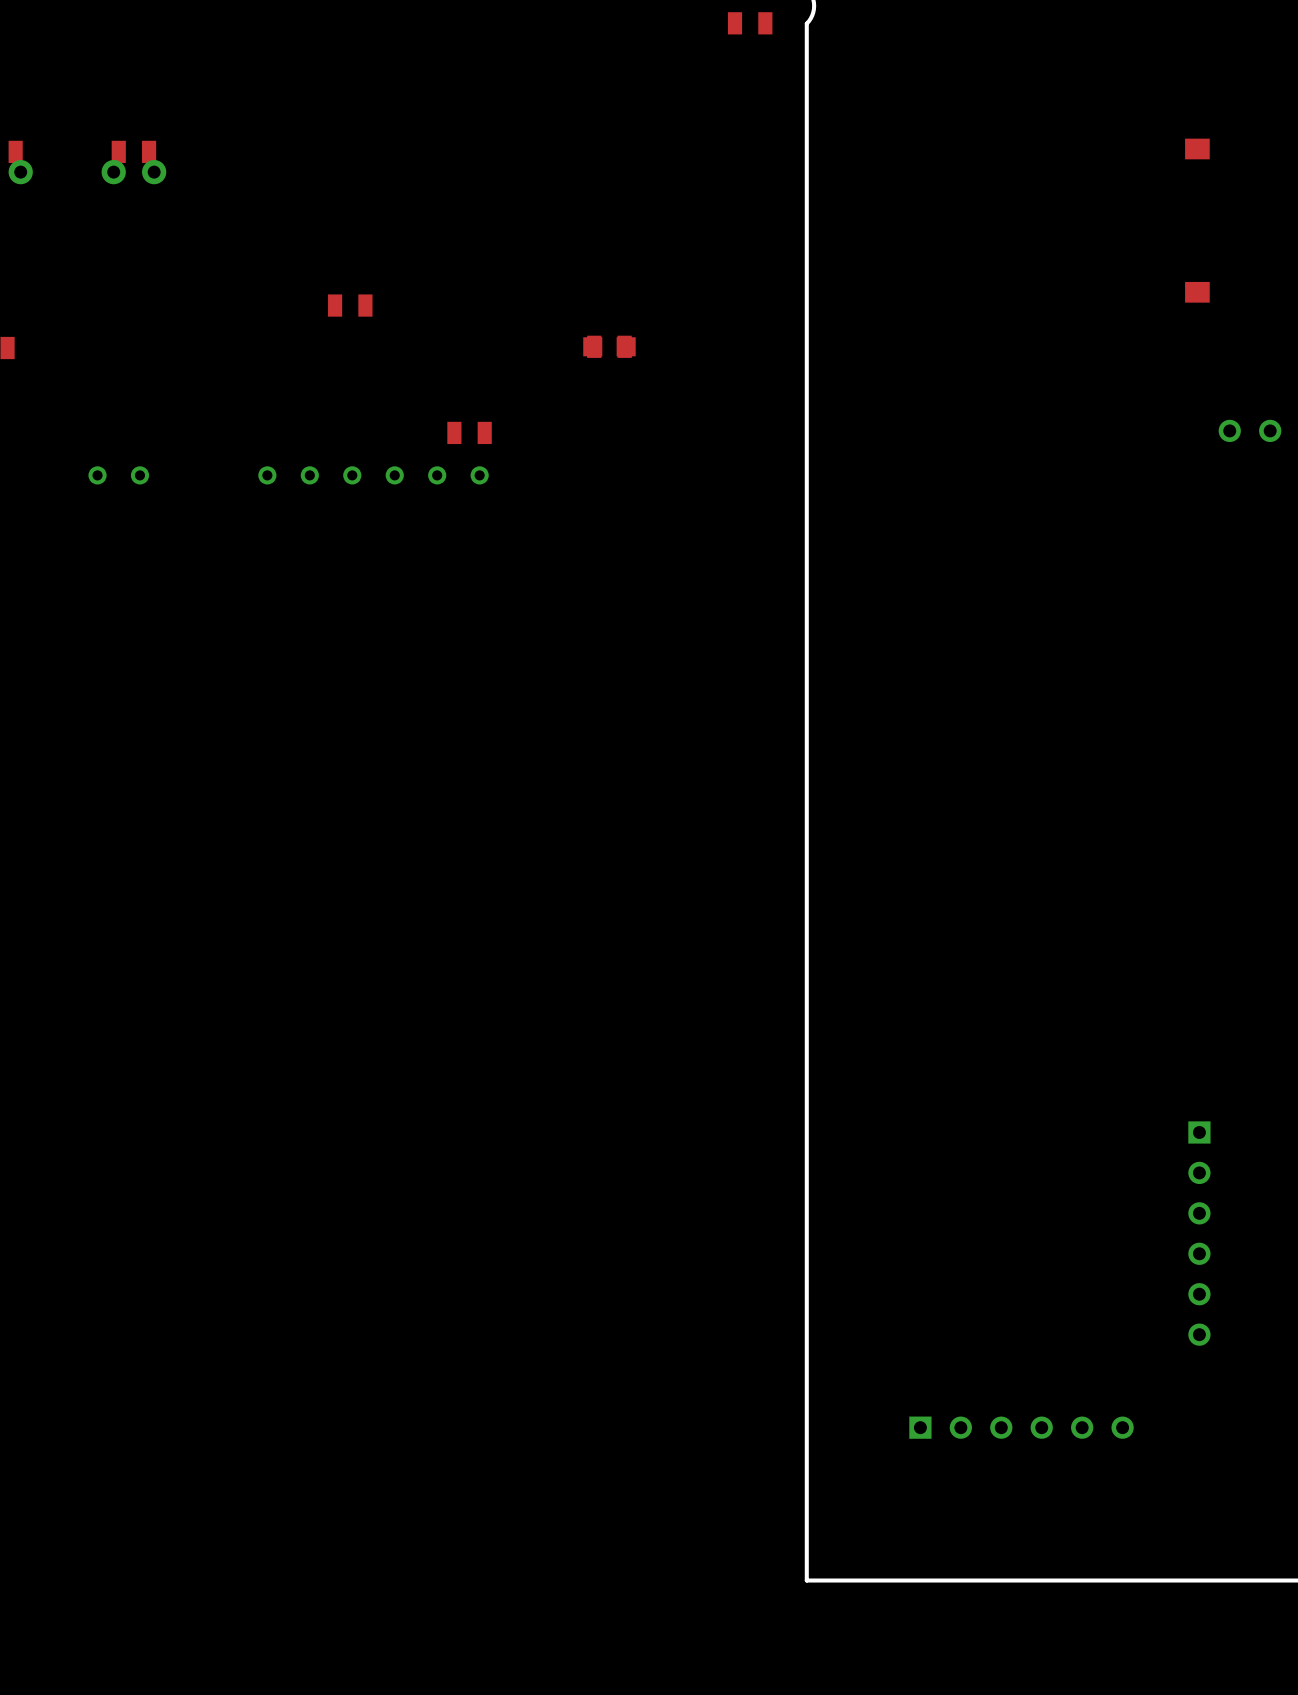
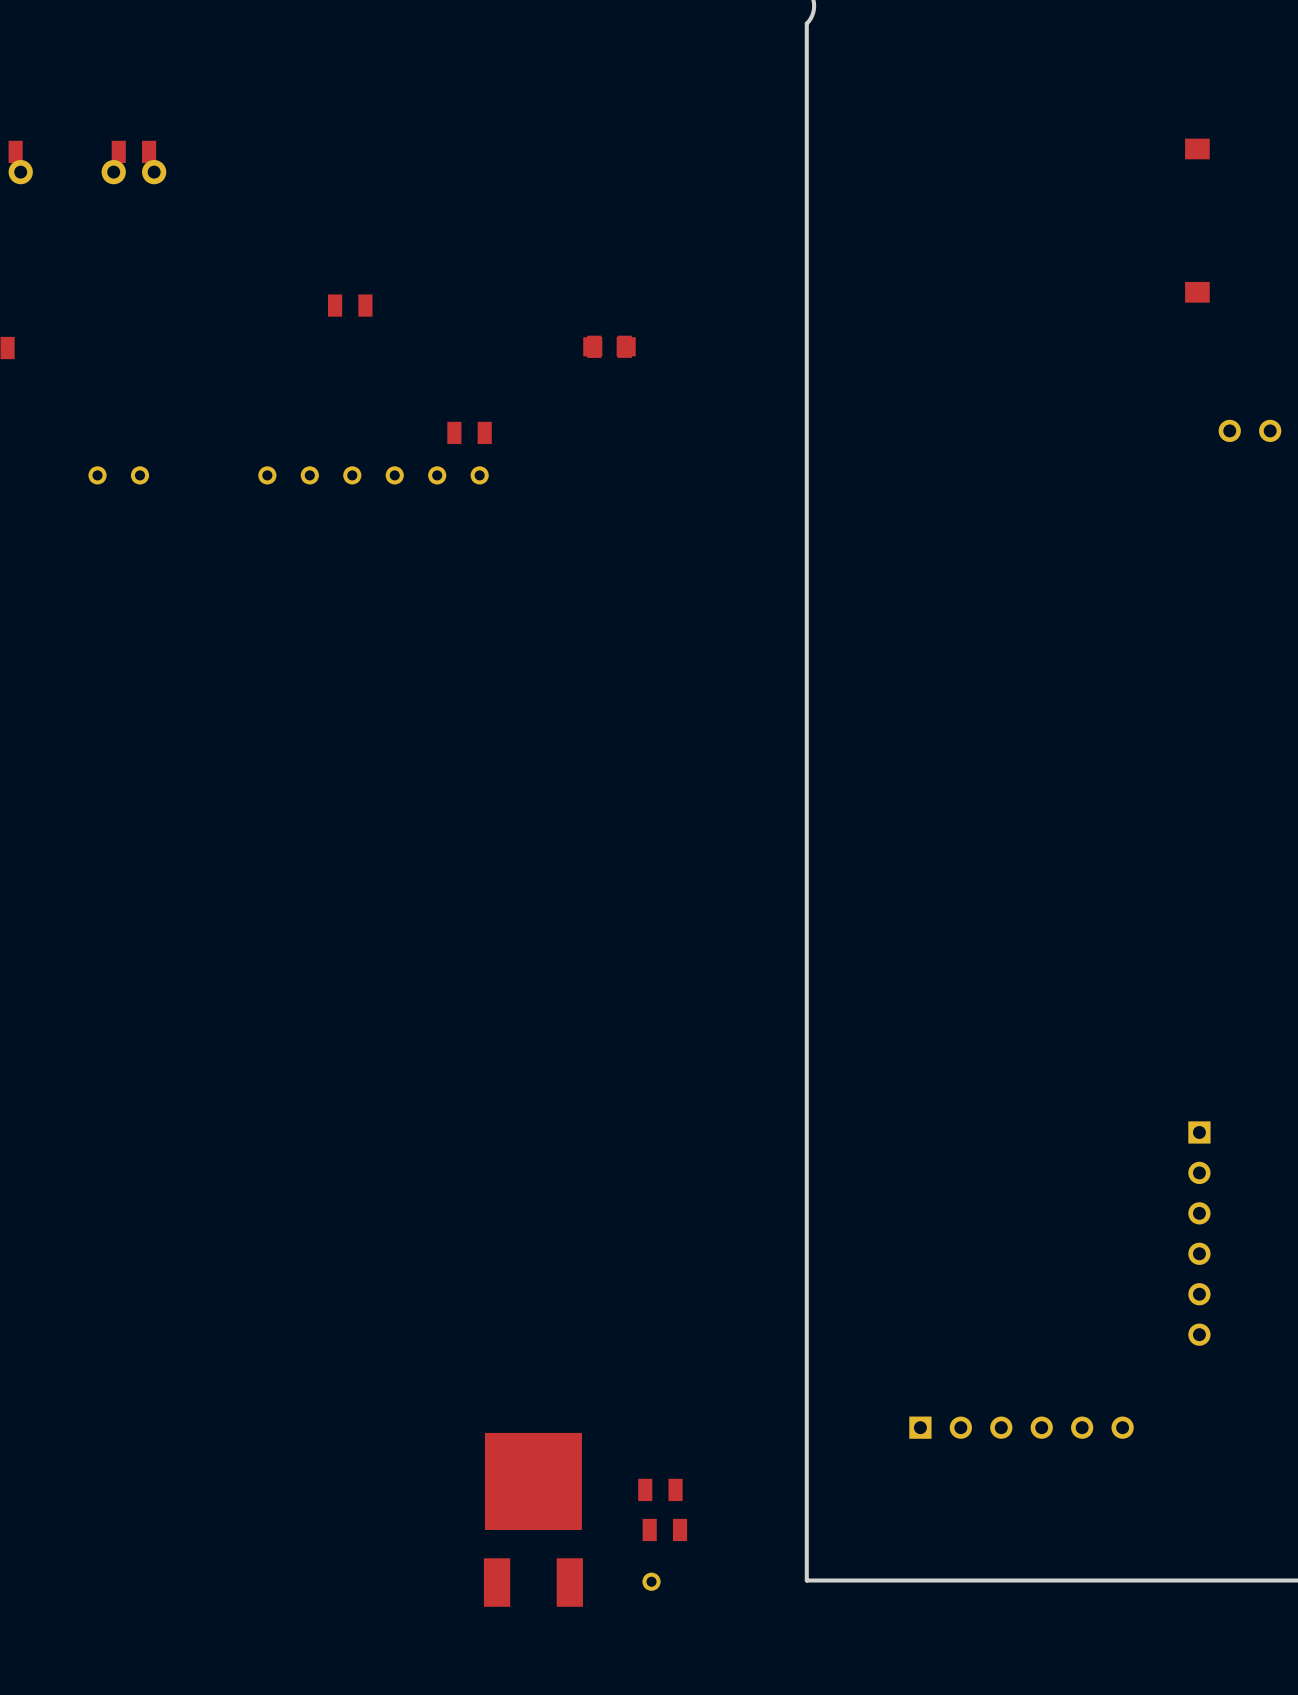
part: (750, 23) -> none
part: none -> (660, 1489)
part: none -> (533, 1519)
part: none -> (664, 1529)
part: none -> (651, 1581)

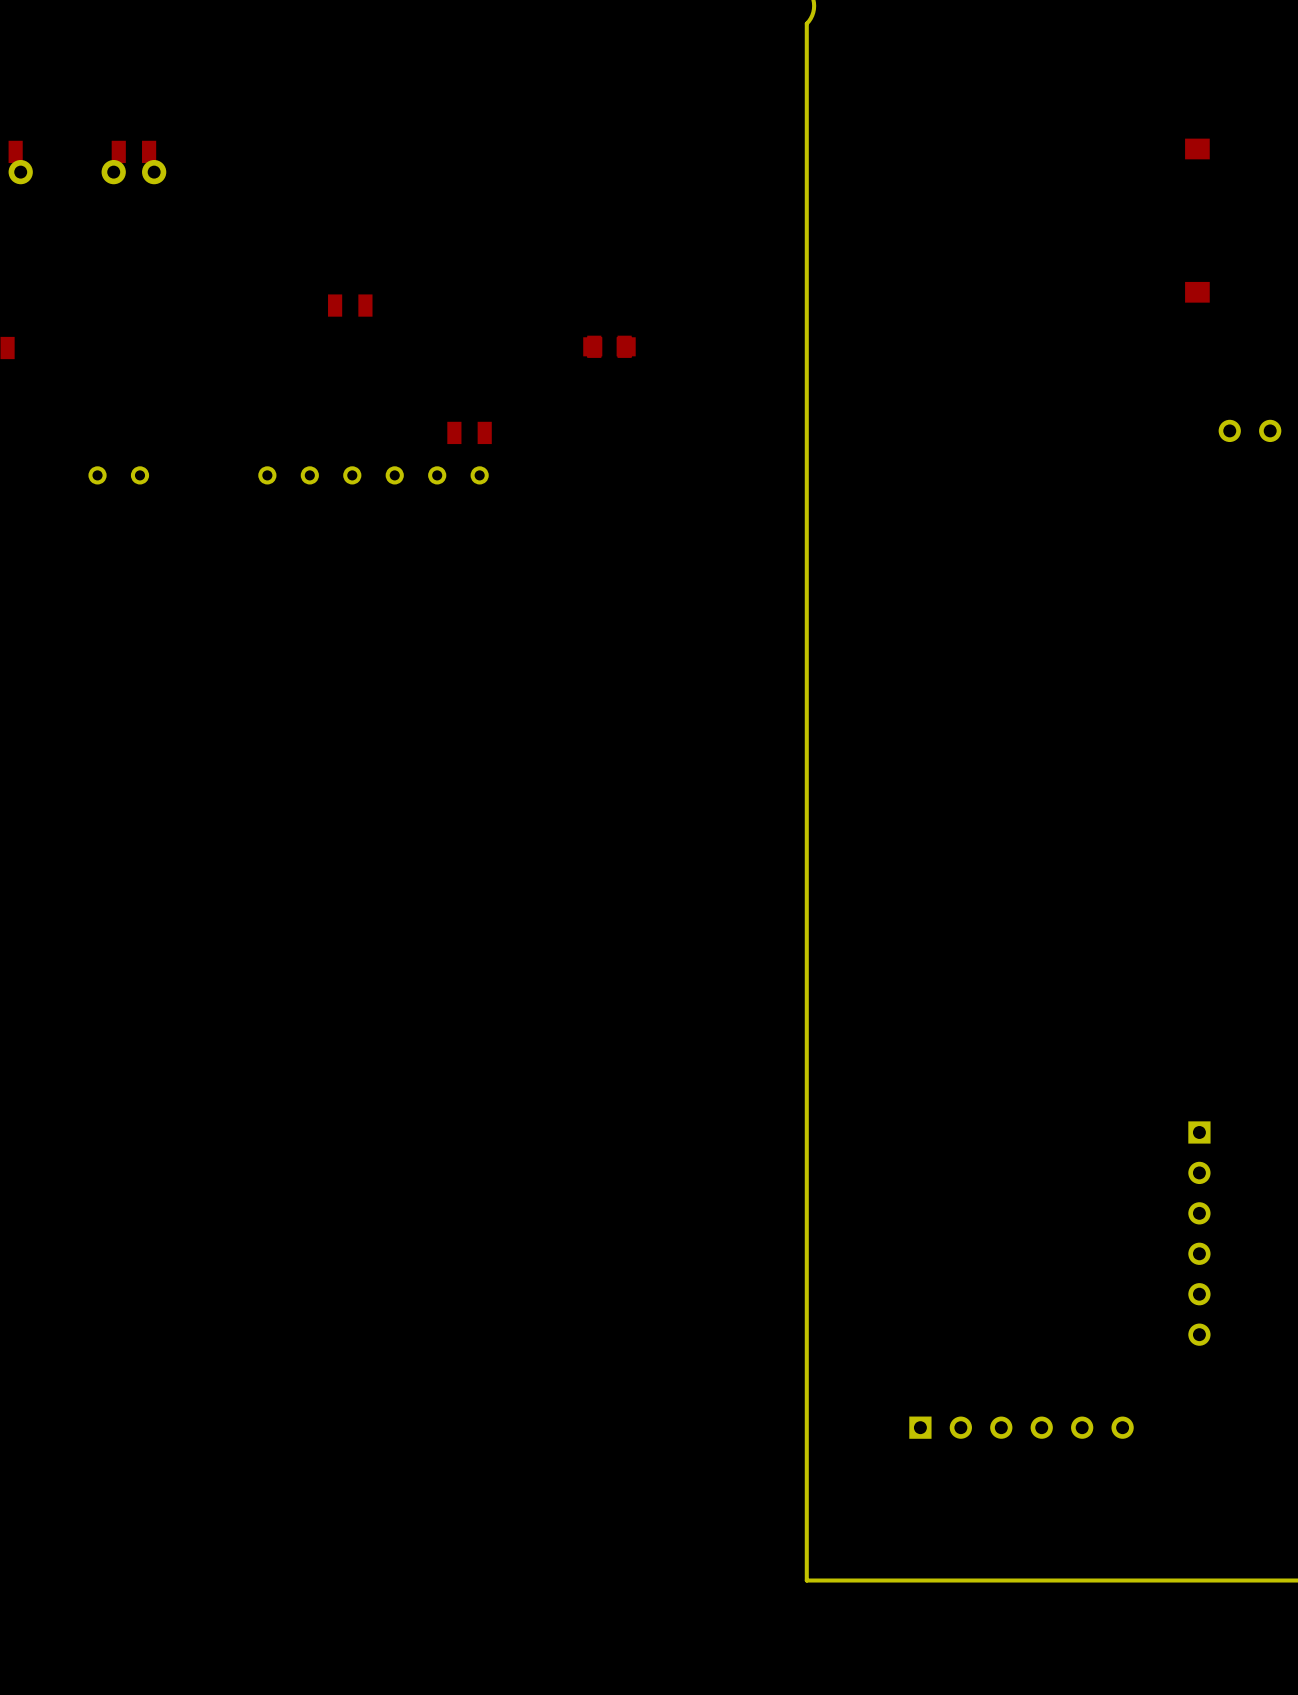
part: (660, 1489) -> none
part: (533, 1519) -> none
part: (664, 1529) -> none
part: (651, 1581) -> none

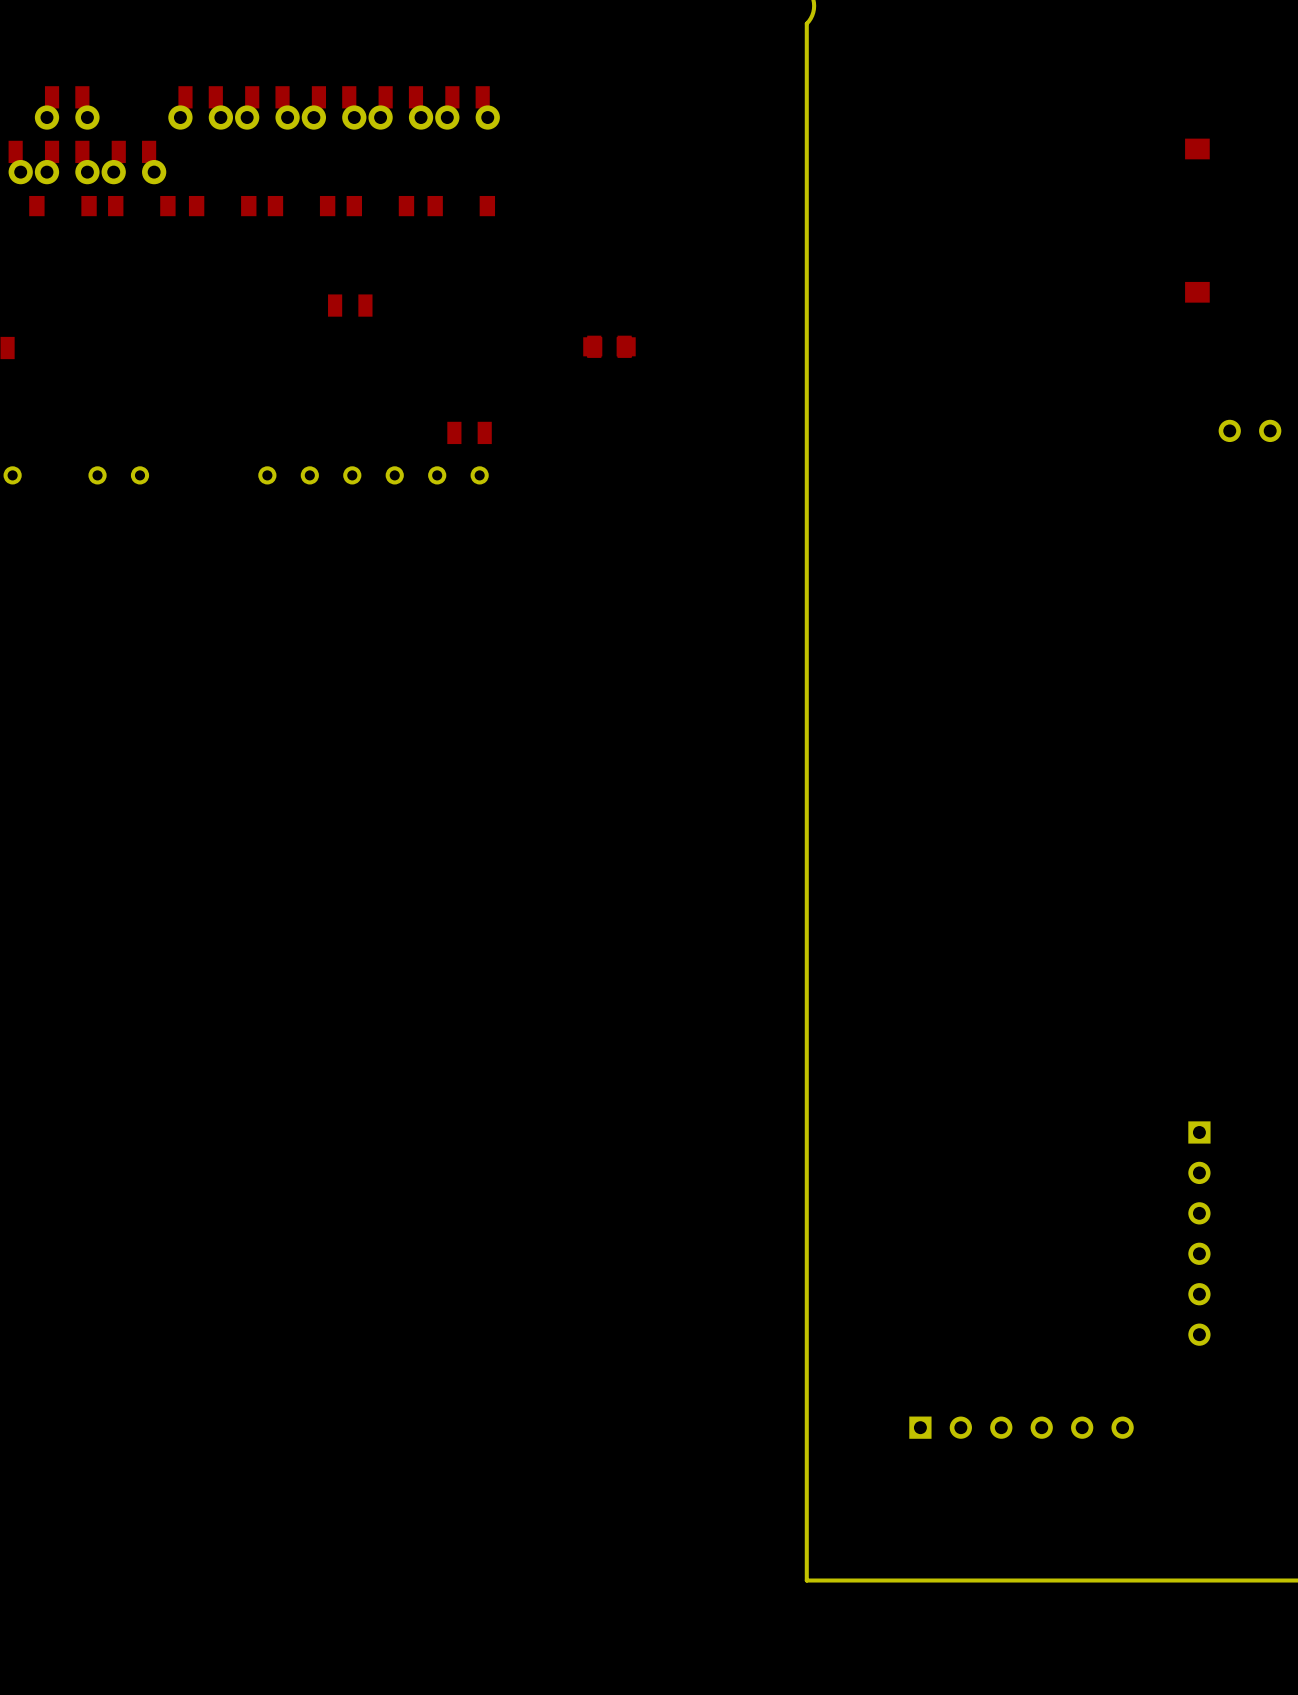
part: none -> (67, 107)
part: none -> (200, 107)
part: none -> (267, 107)
part: none -> (334, 107)
part: none -> (400, 107)
part: none -> (467, 107)
part: none -> (67, 162)
part: none -> (62, 206)
part: none -> (141, 206)
part: none -> (222, 206)
part: none -> (301, 206)
part: none -> (380, 206)
part: none -> (461, 206)
part: none -> (12, 475)

